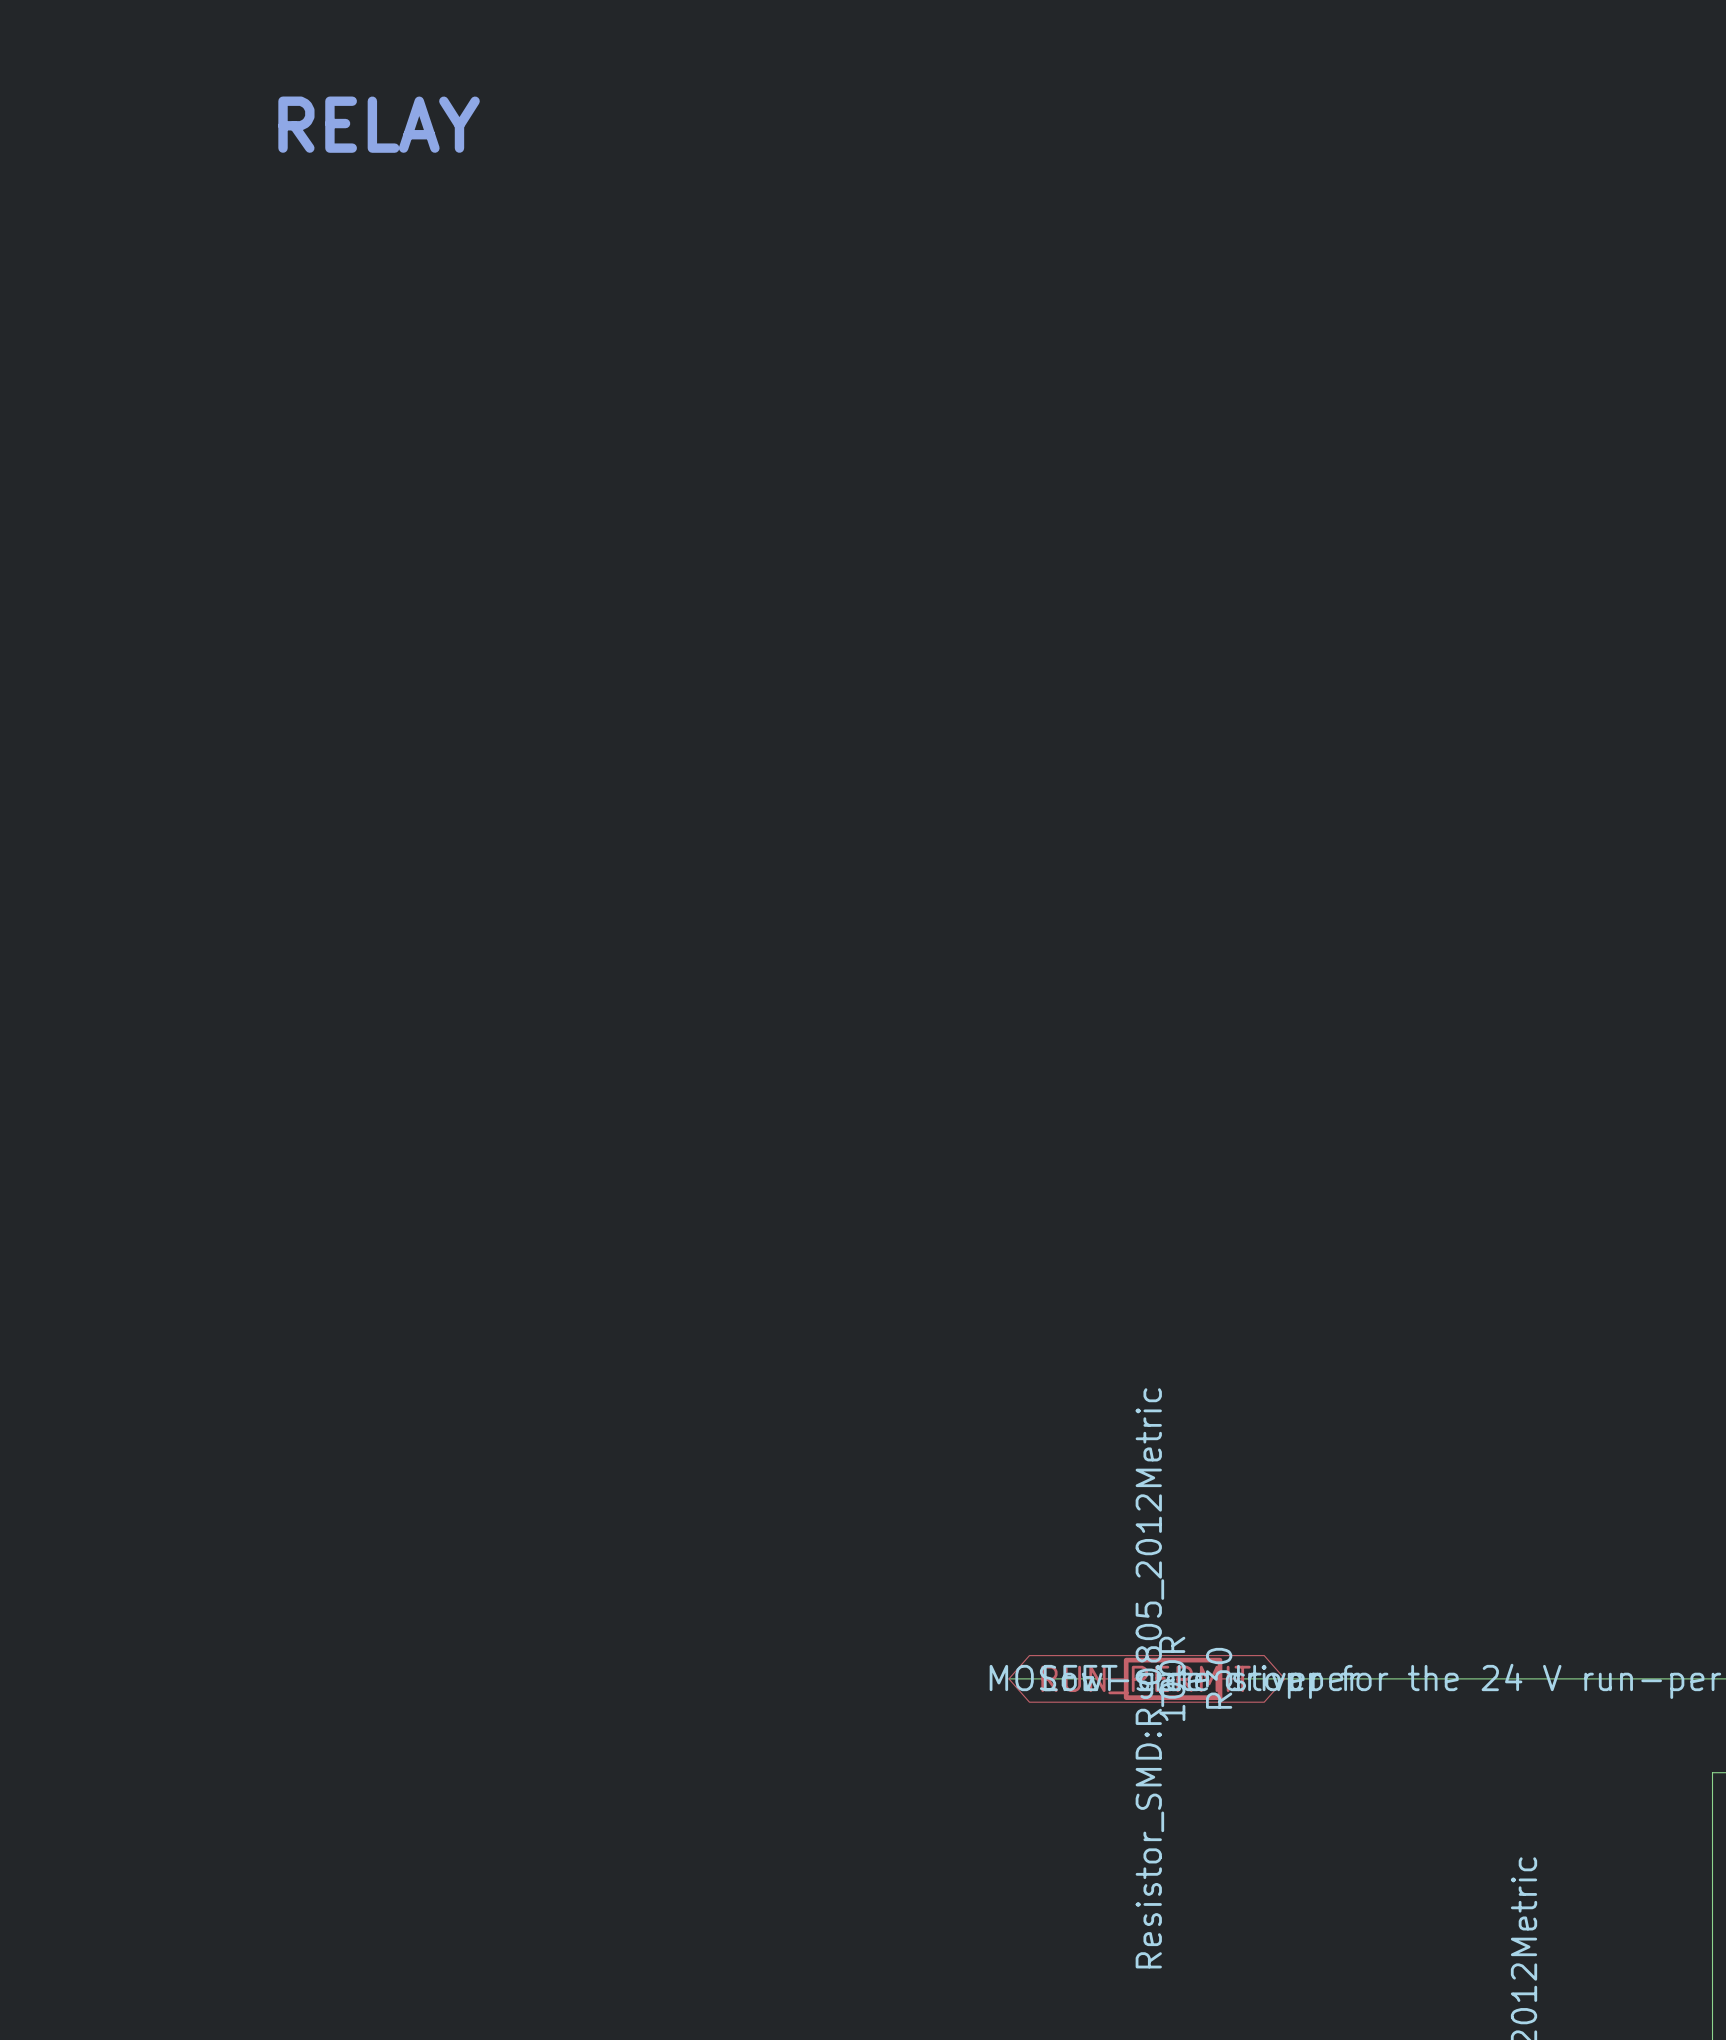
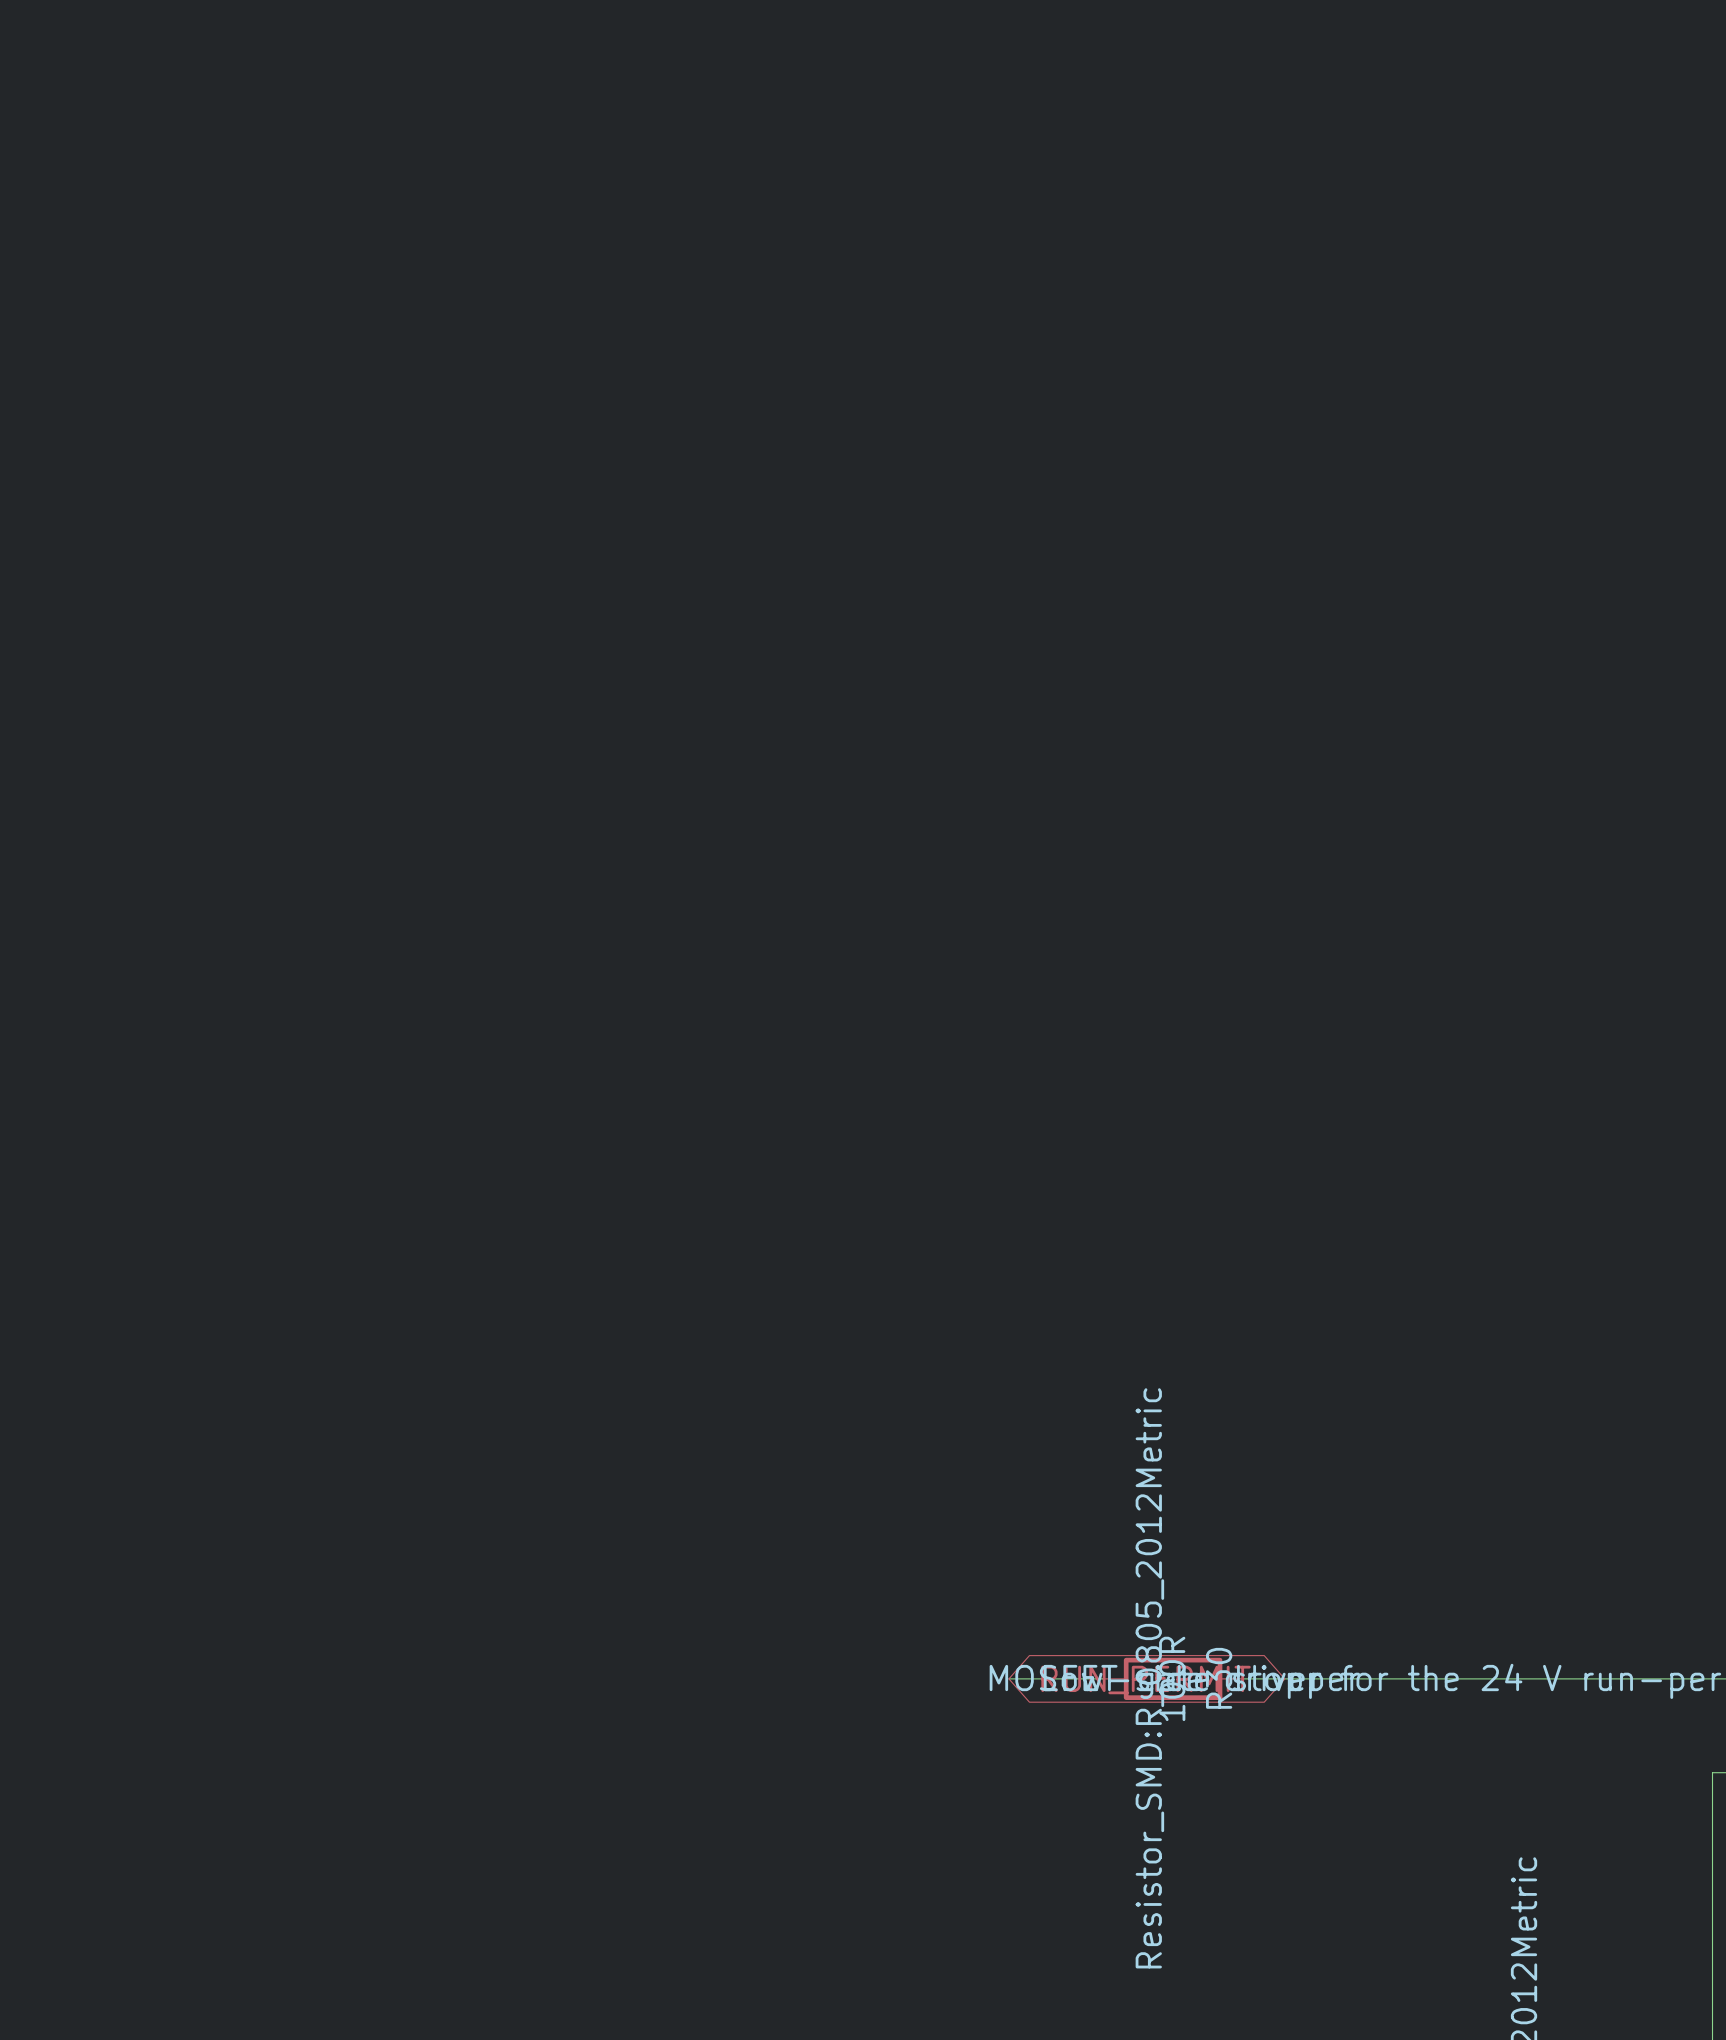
text: RELAY (379, 124) -> none

